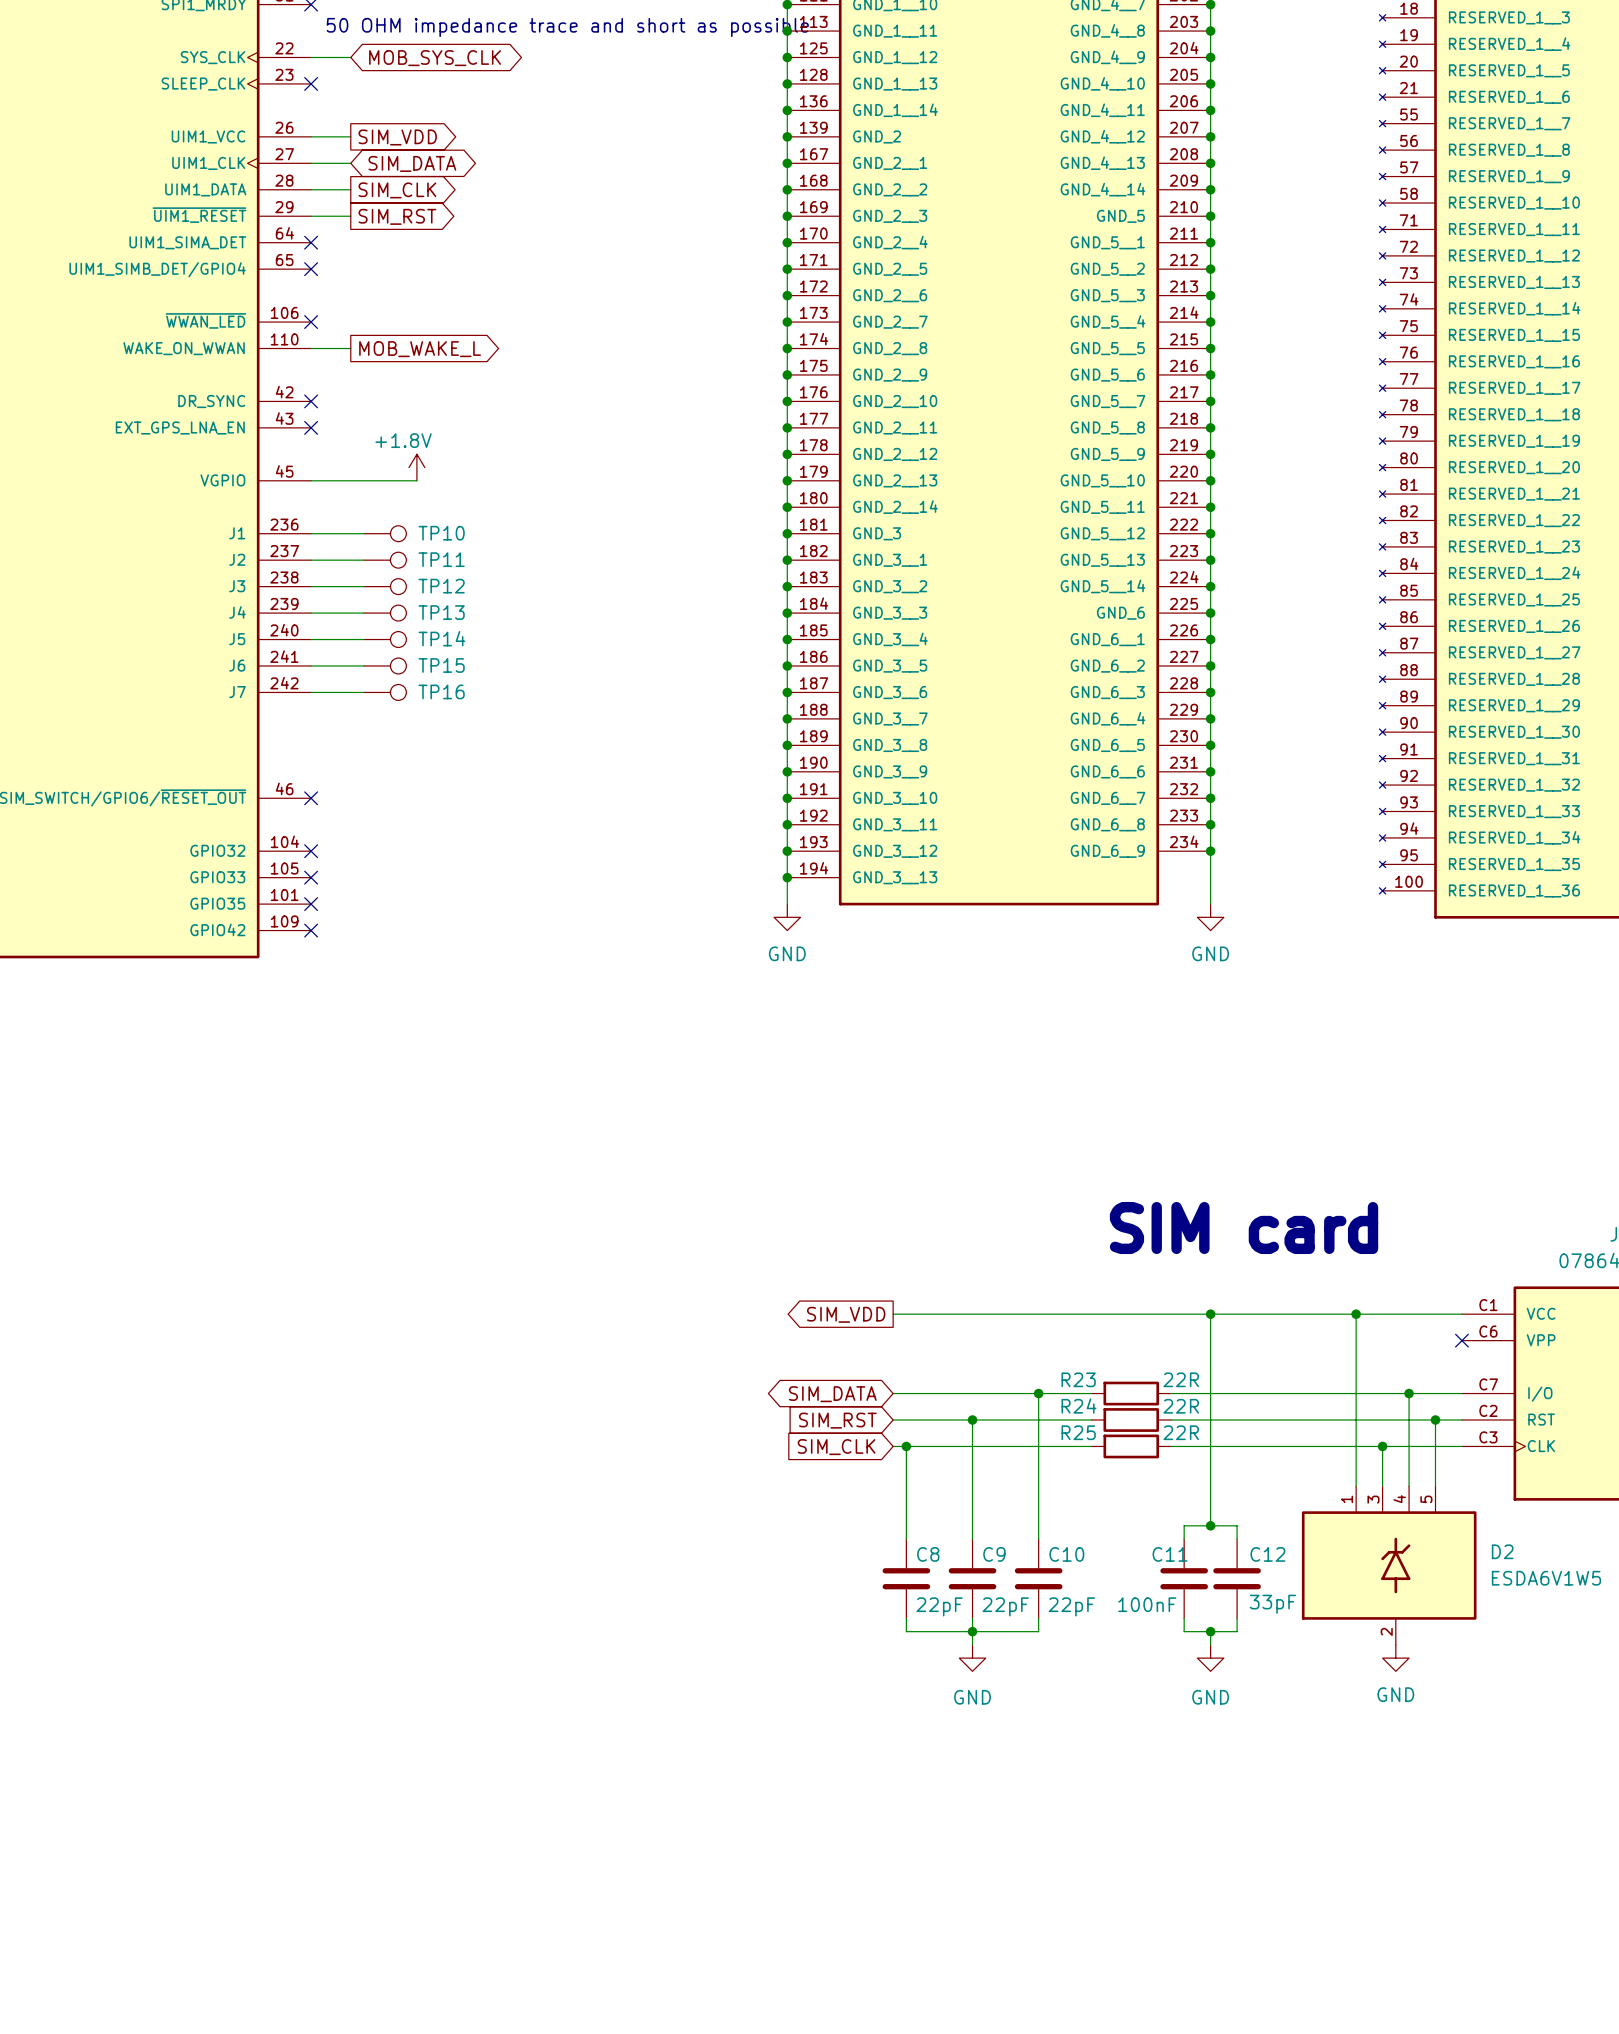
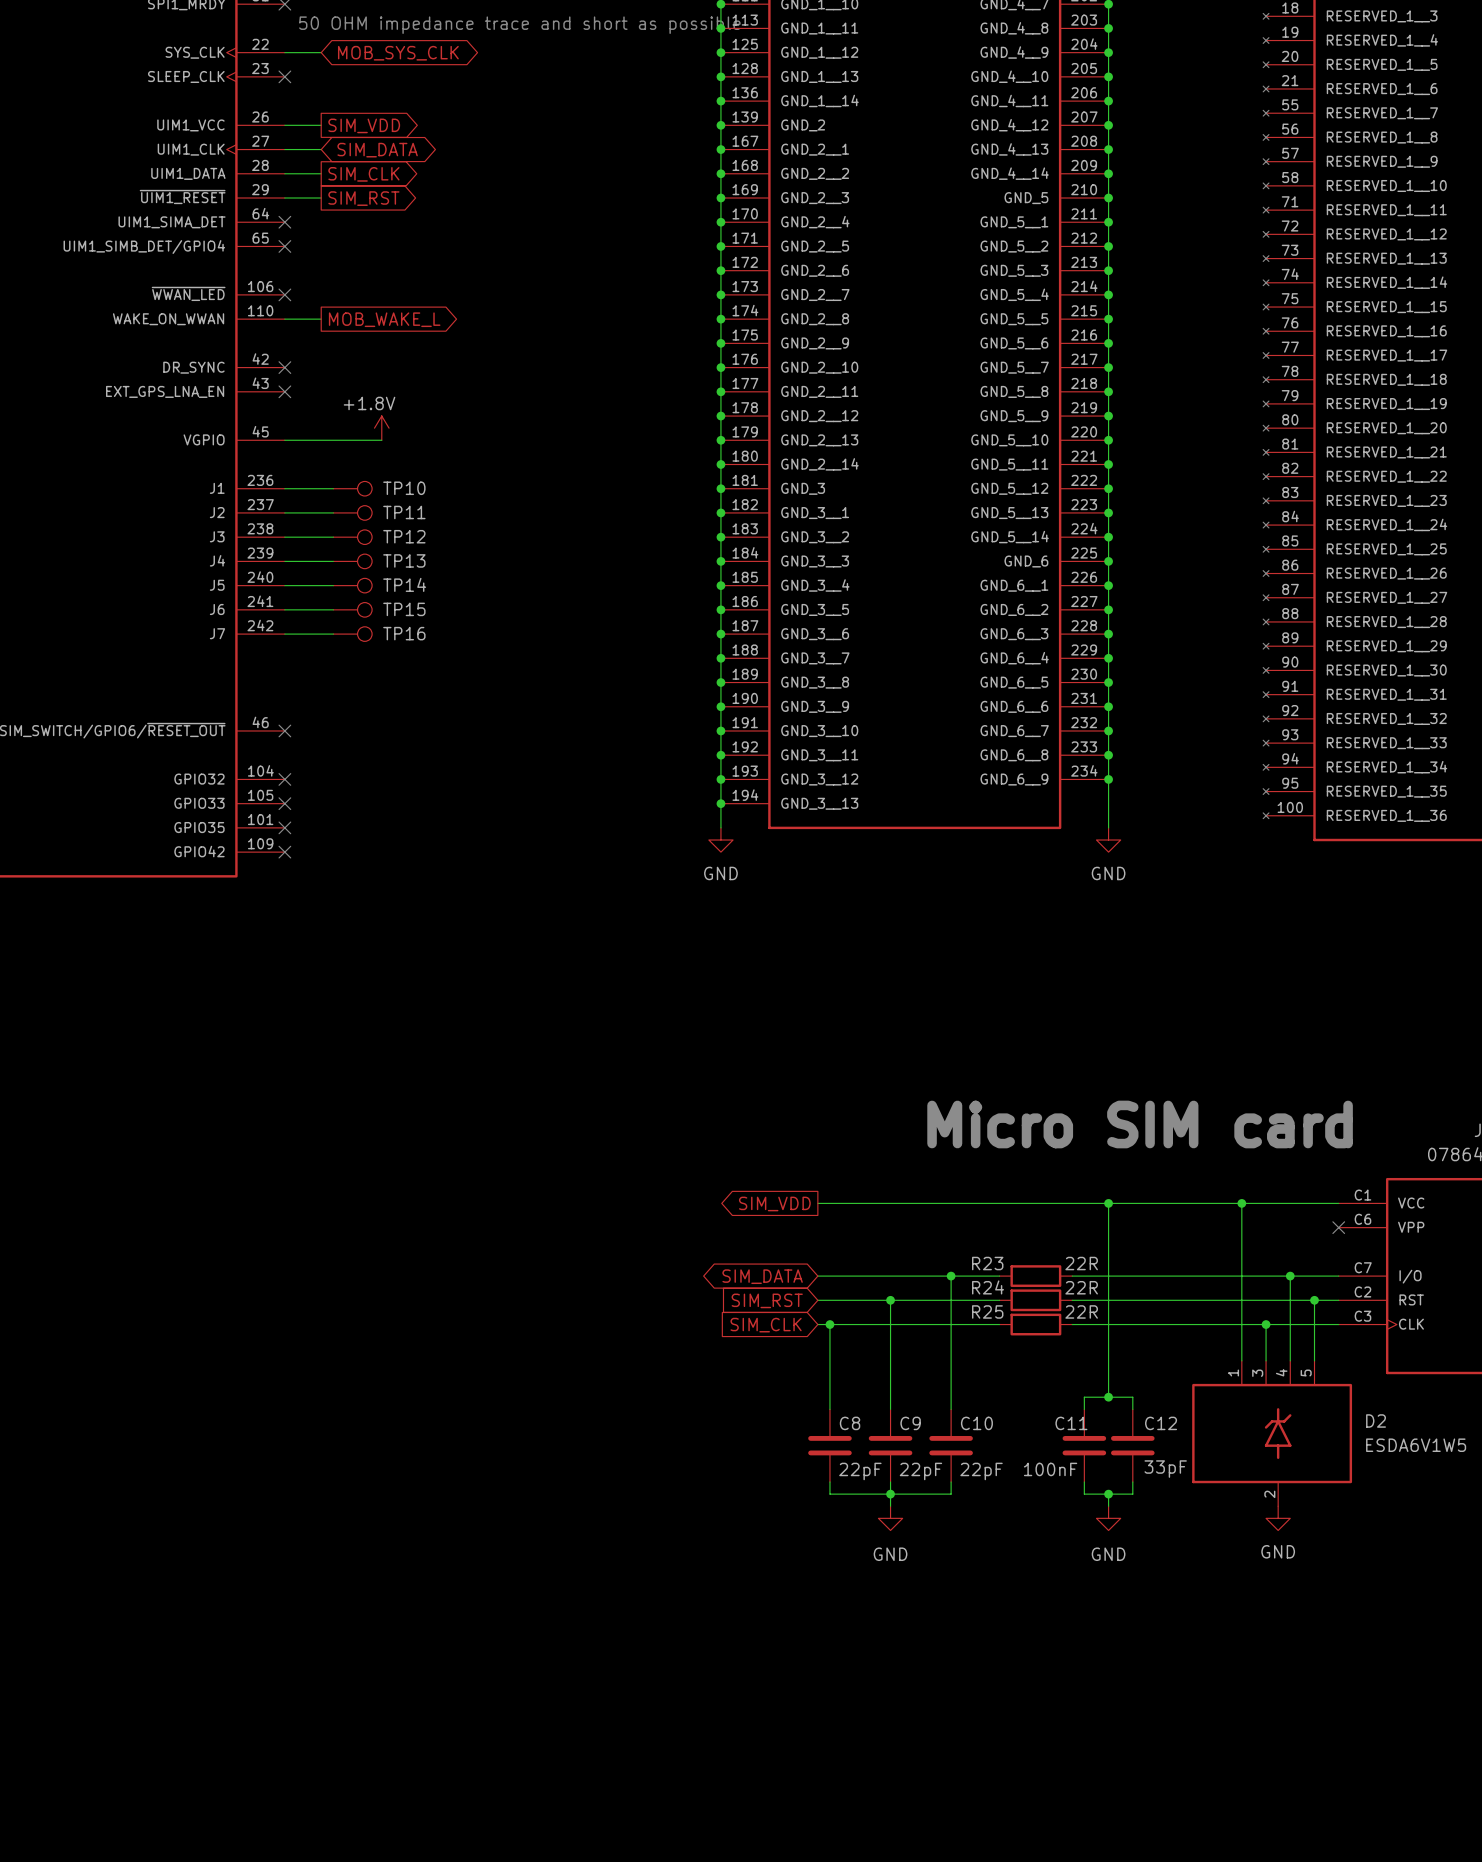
text: SIM card (1244, 1228) -> Micro SIM card (1140, 1124)

